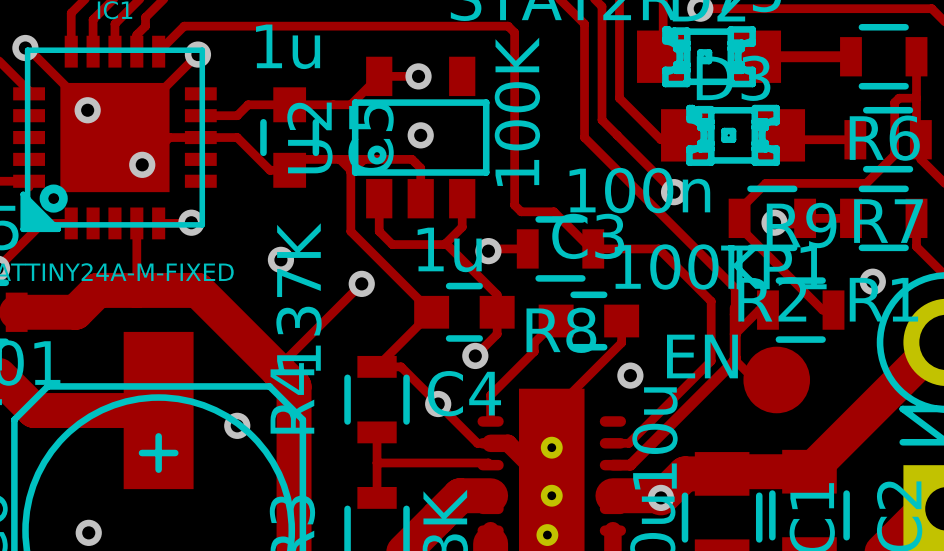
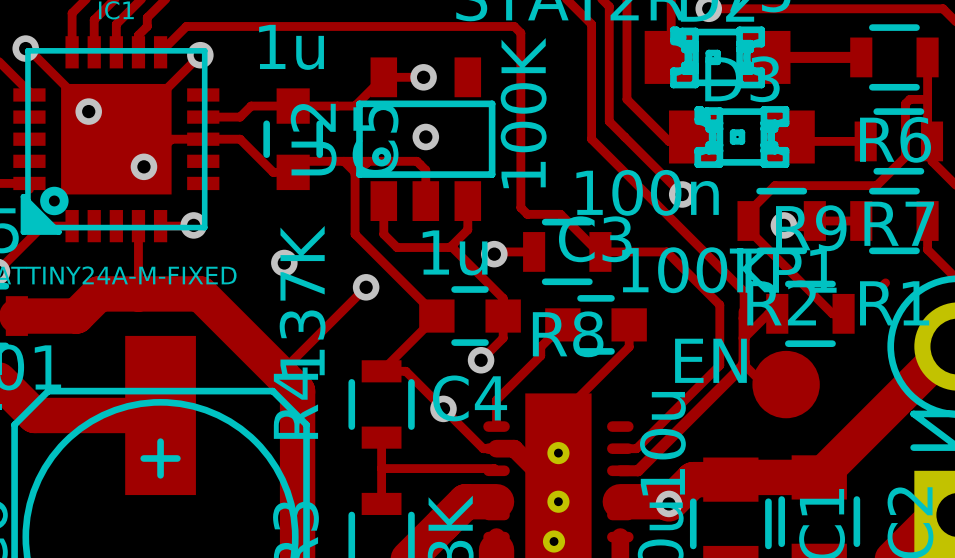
via: (872, 281) -> none
via: (630, 375) -> none
via: (237, 425) -> none
via: (88, 532) -> none

